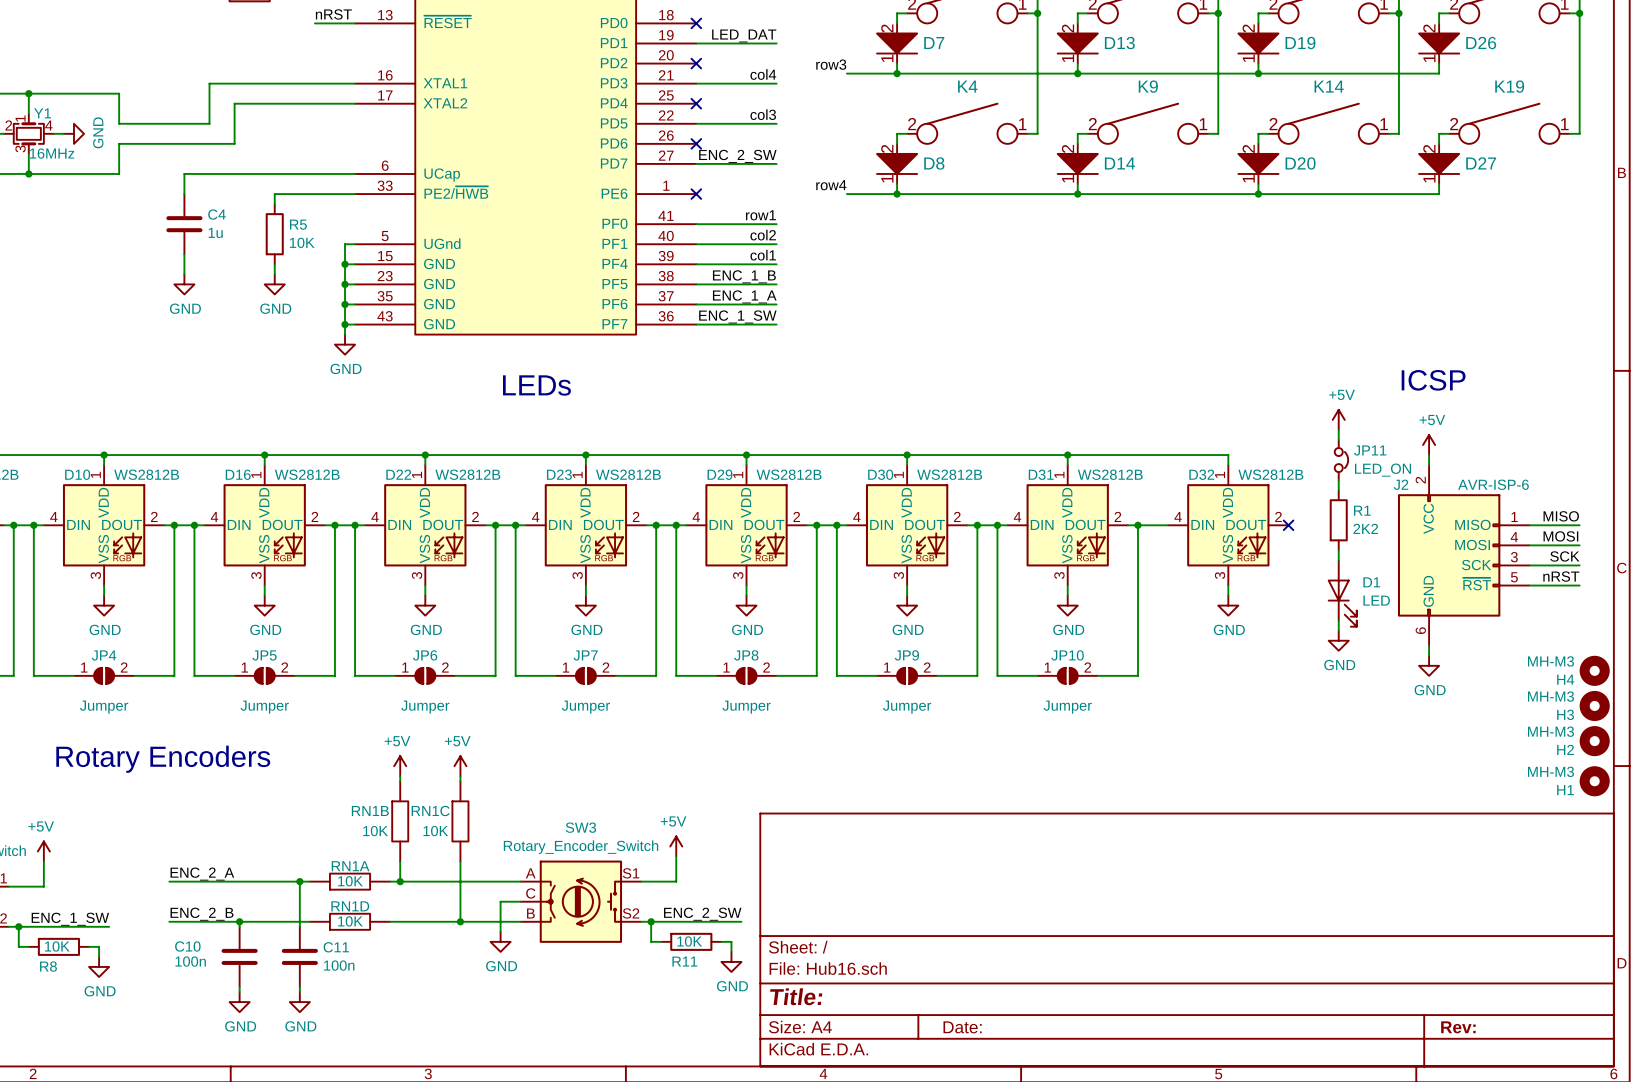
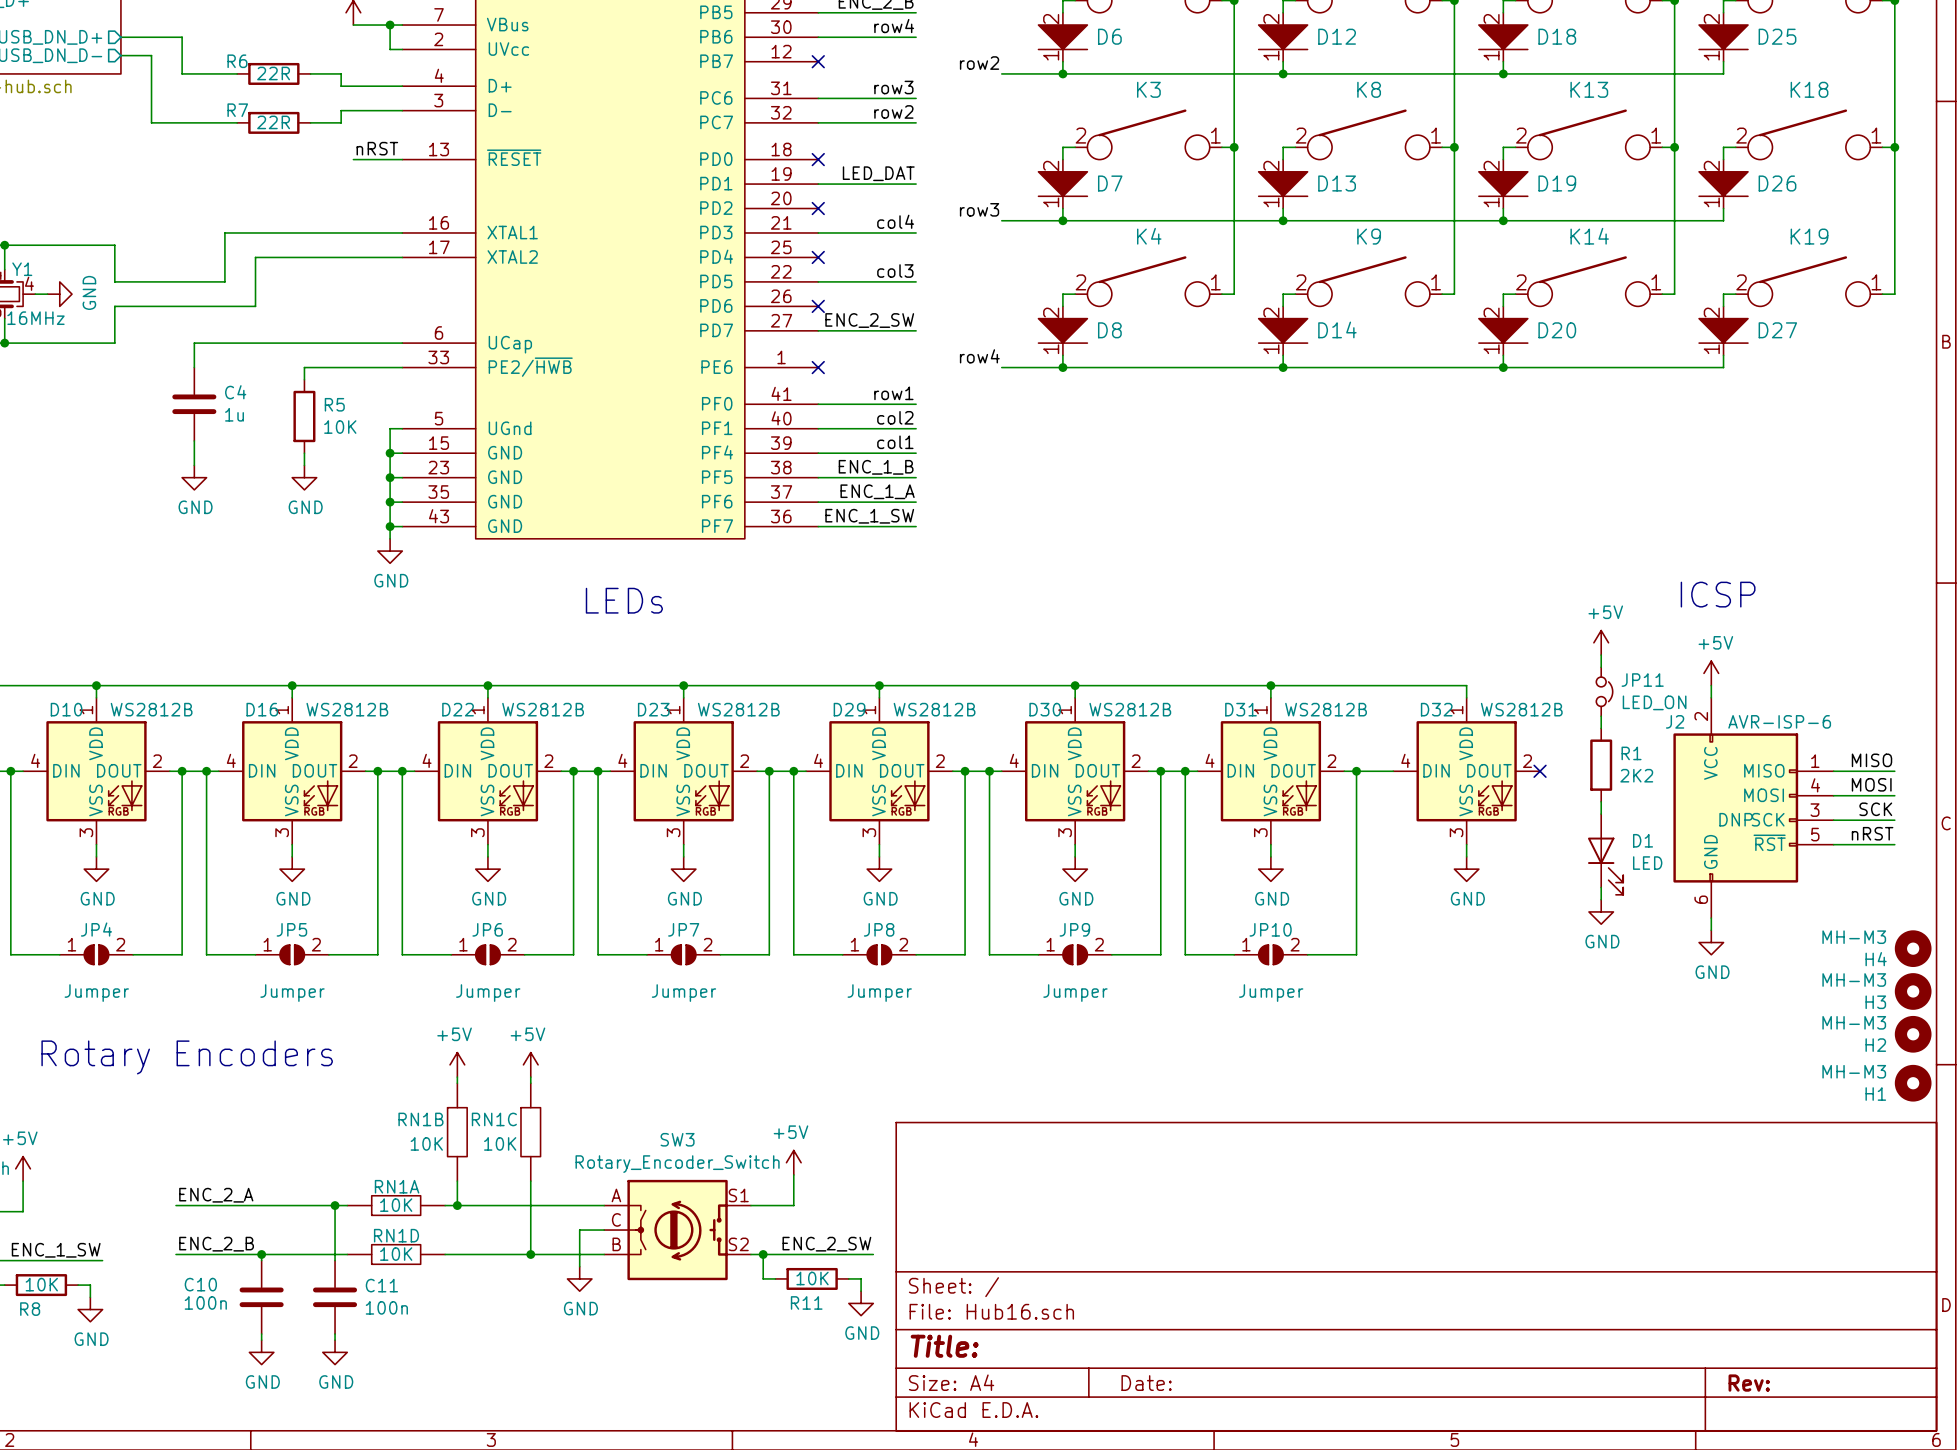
J2 text: none -> DNP (1736, 819)

